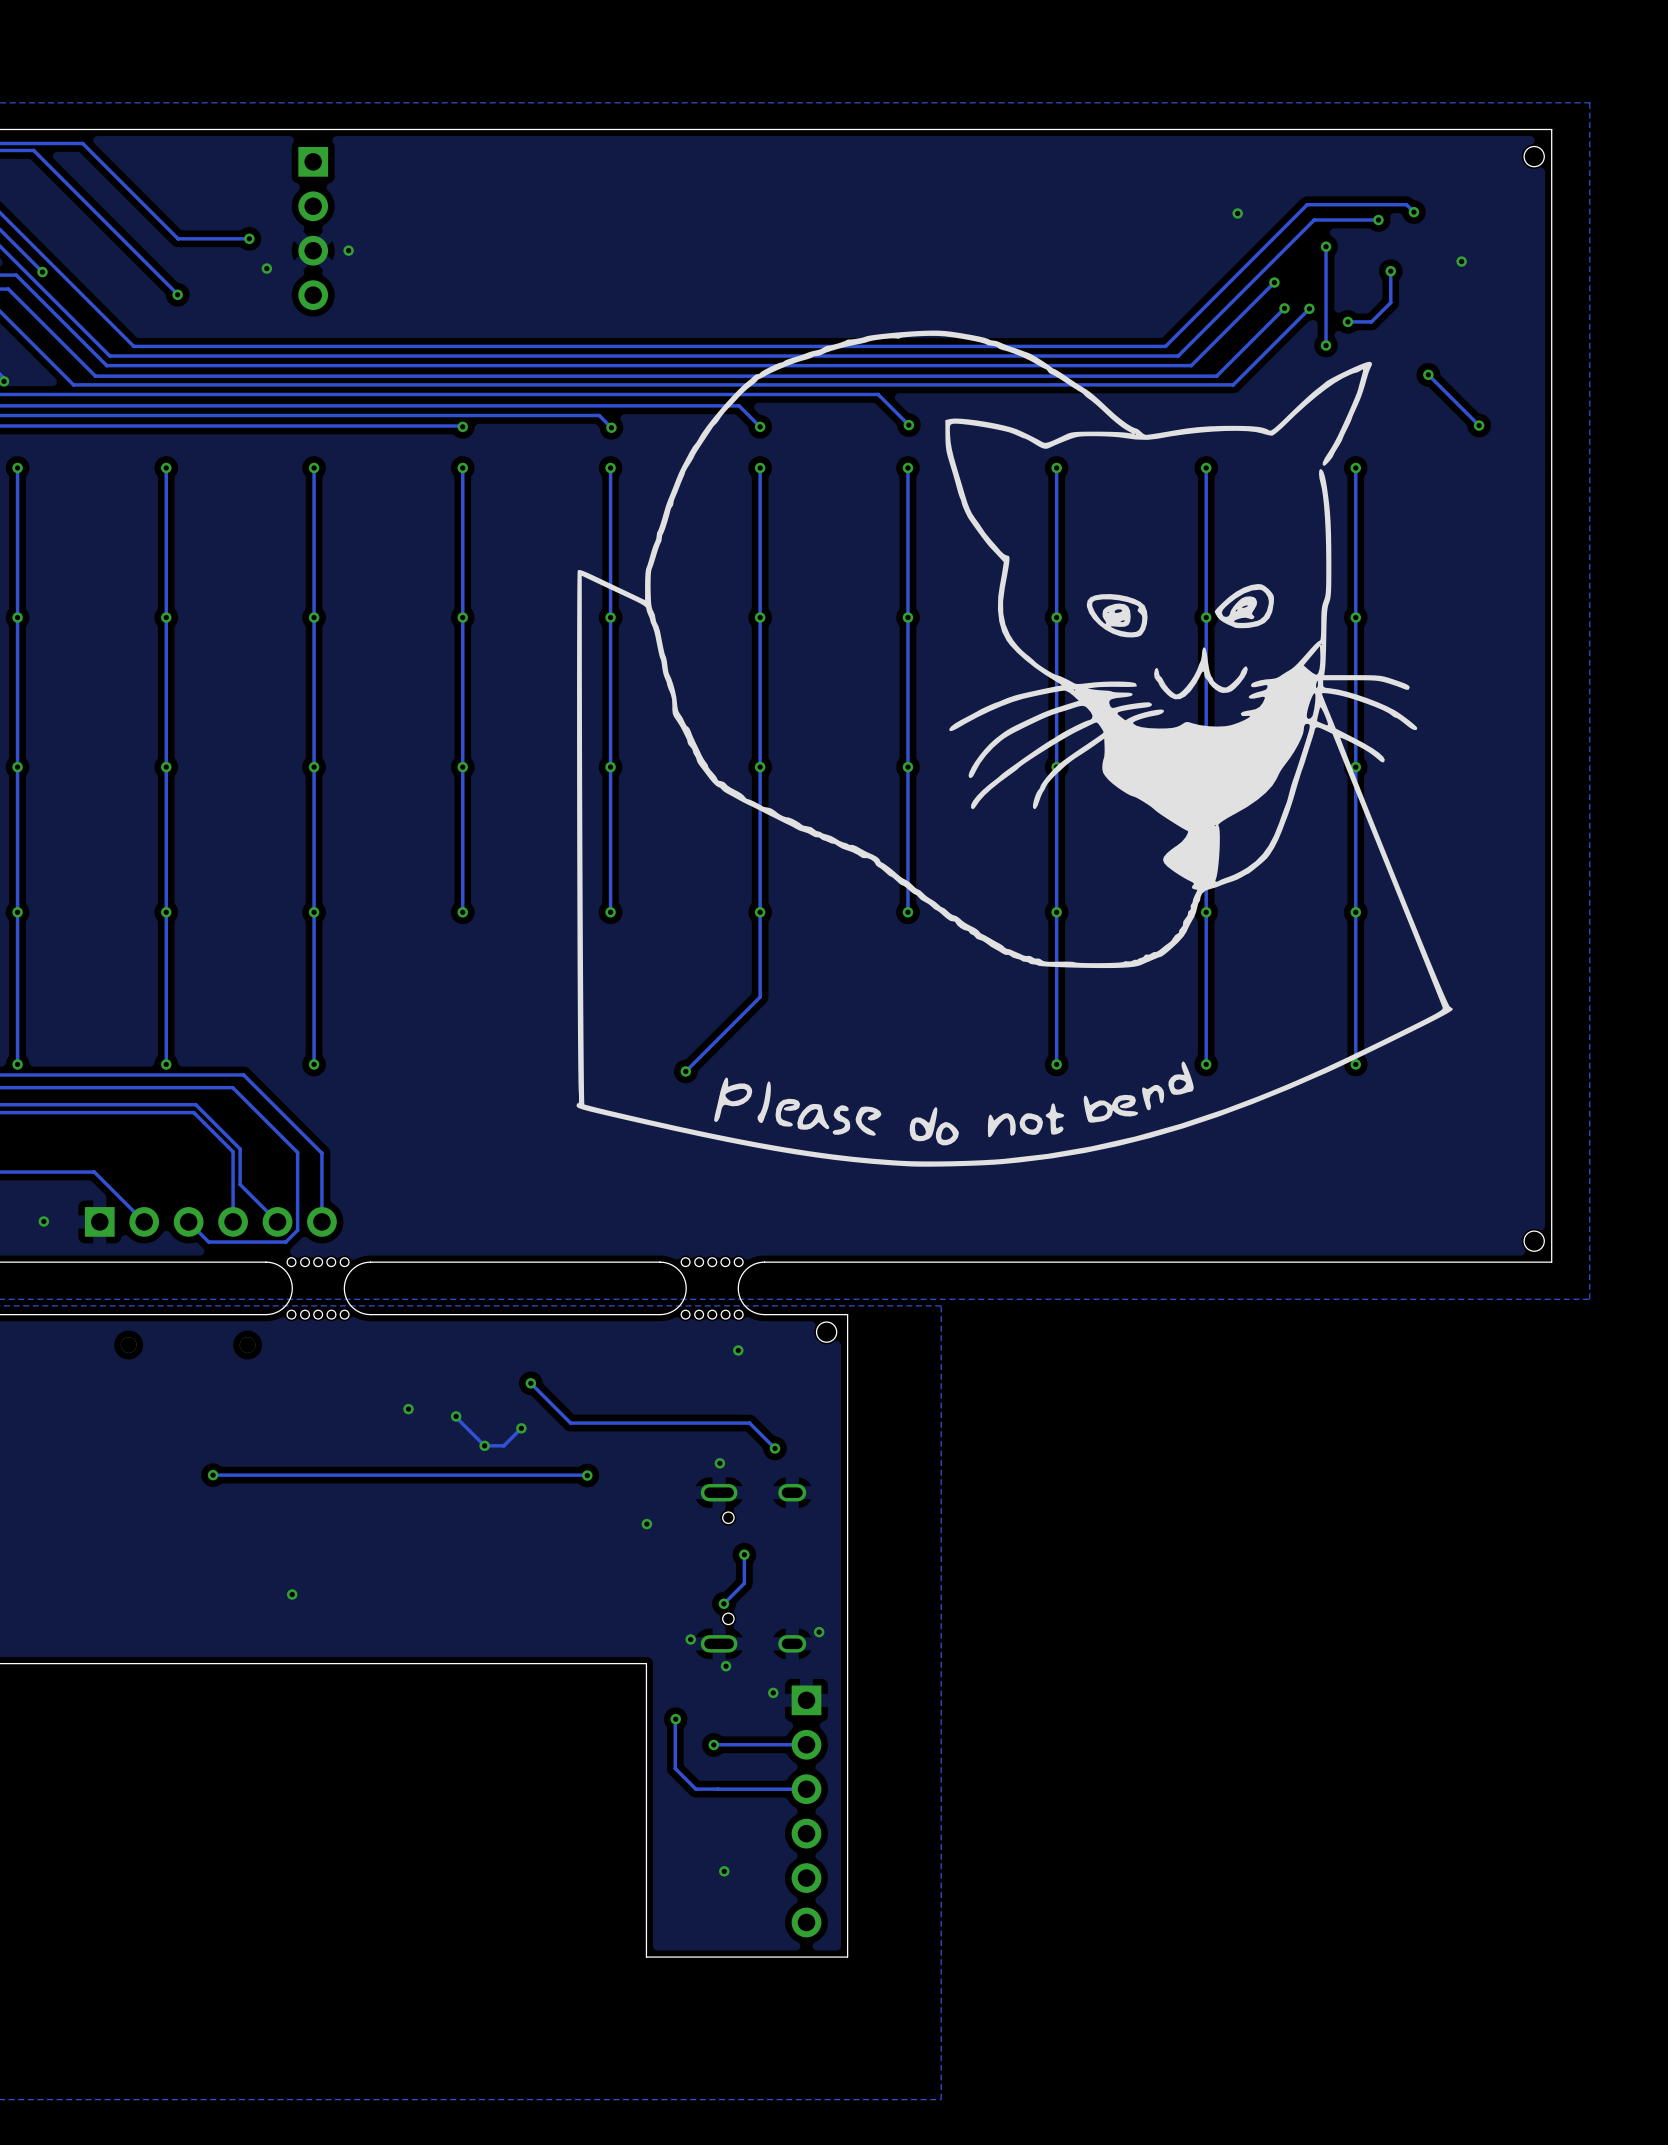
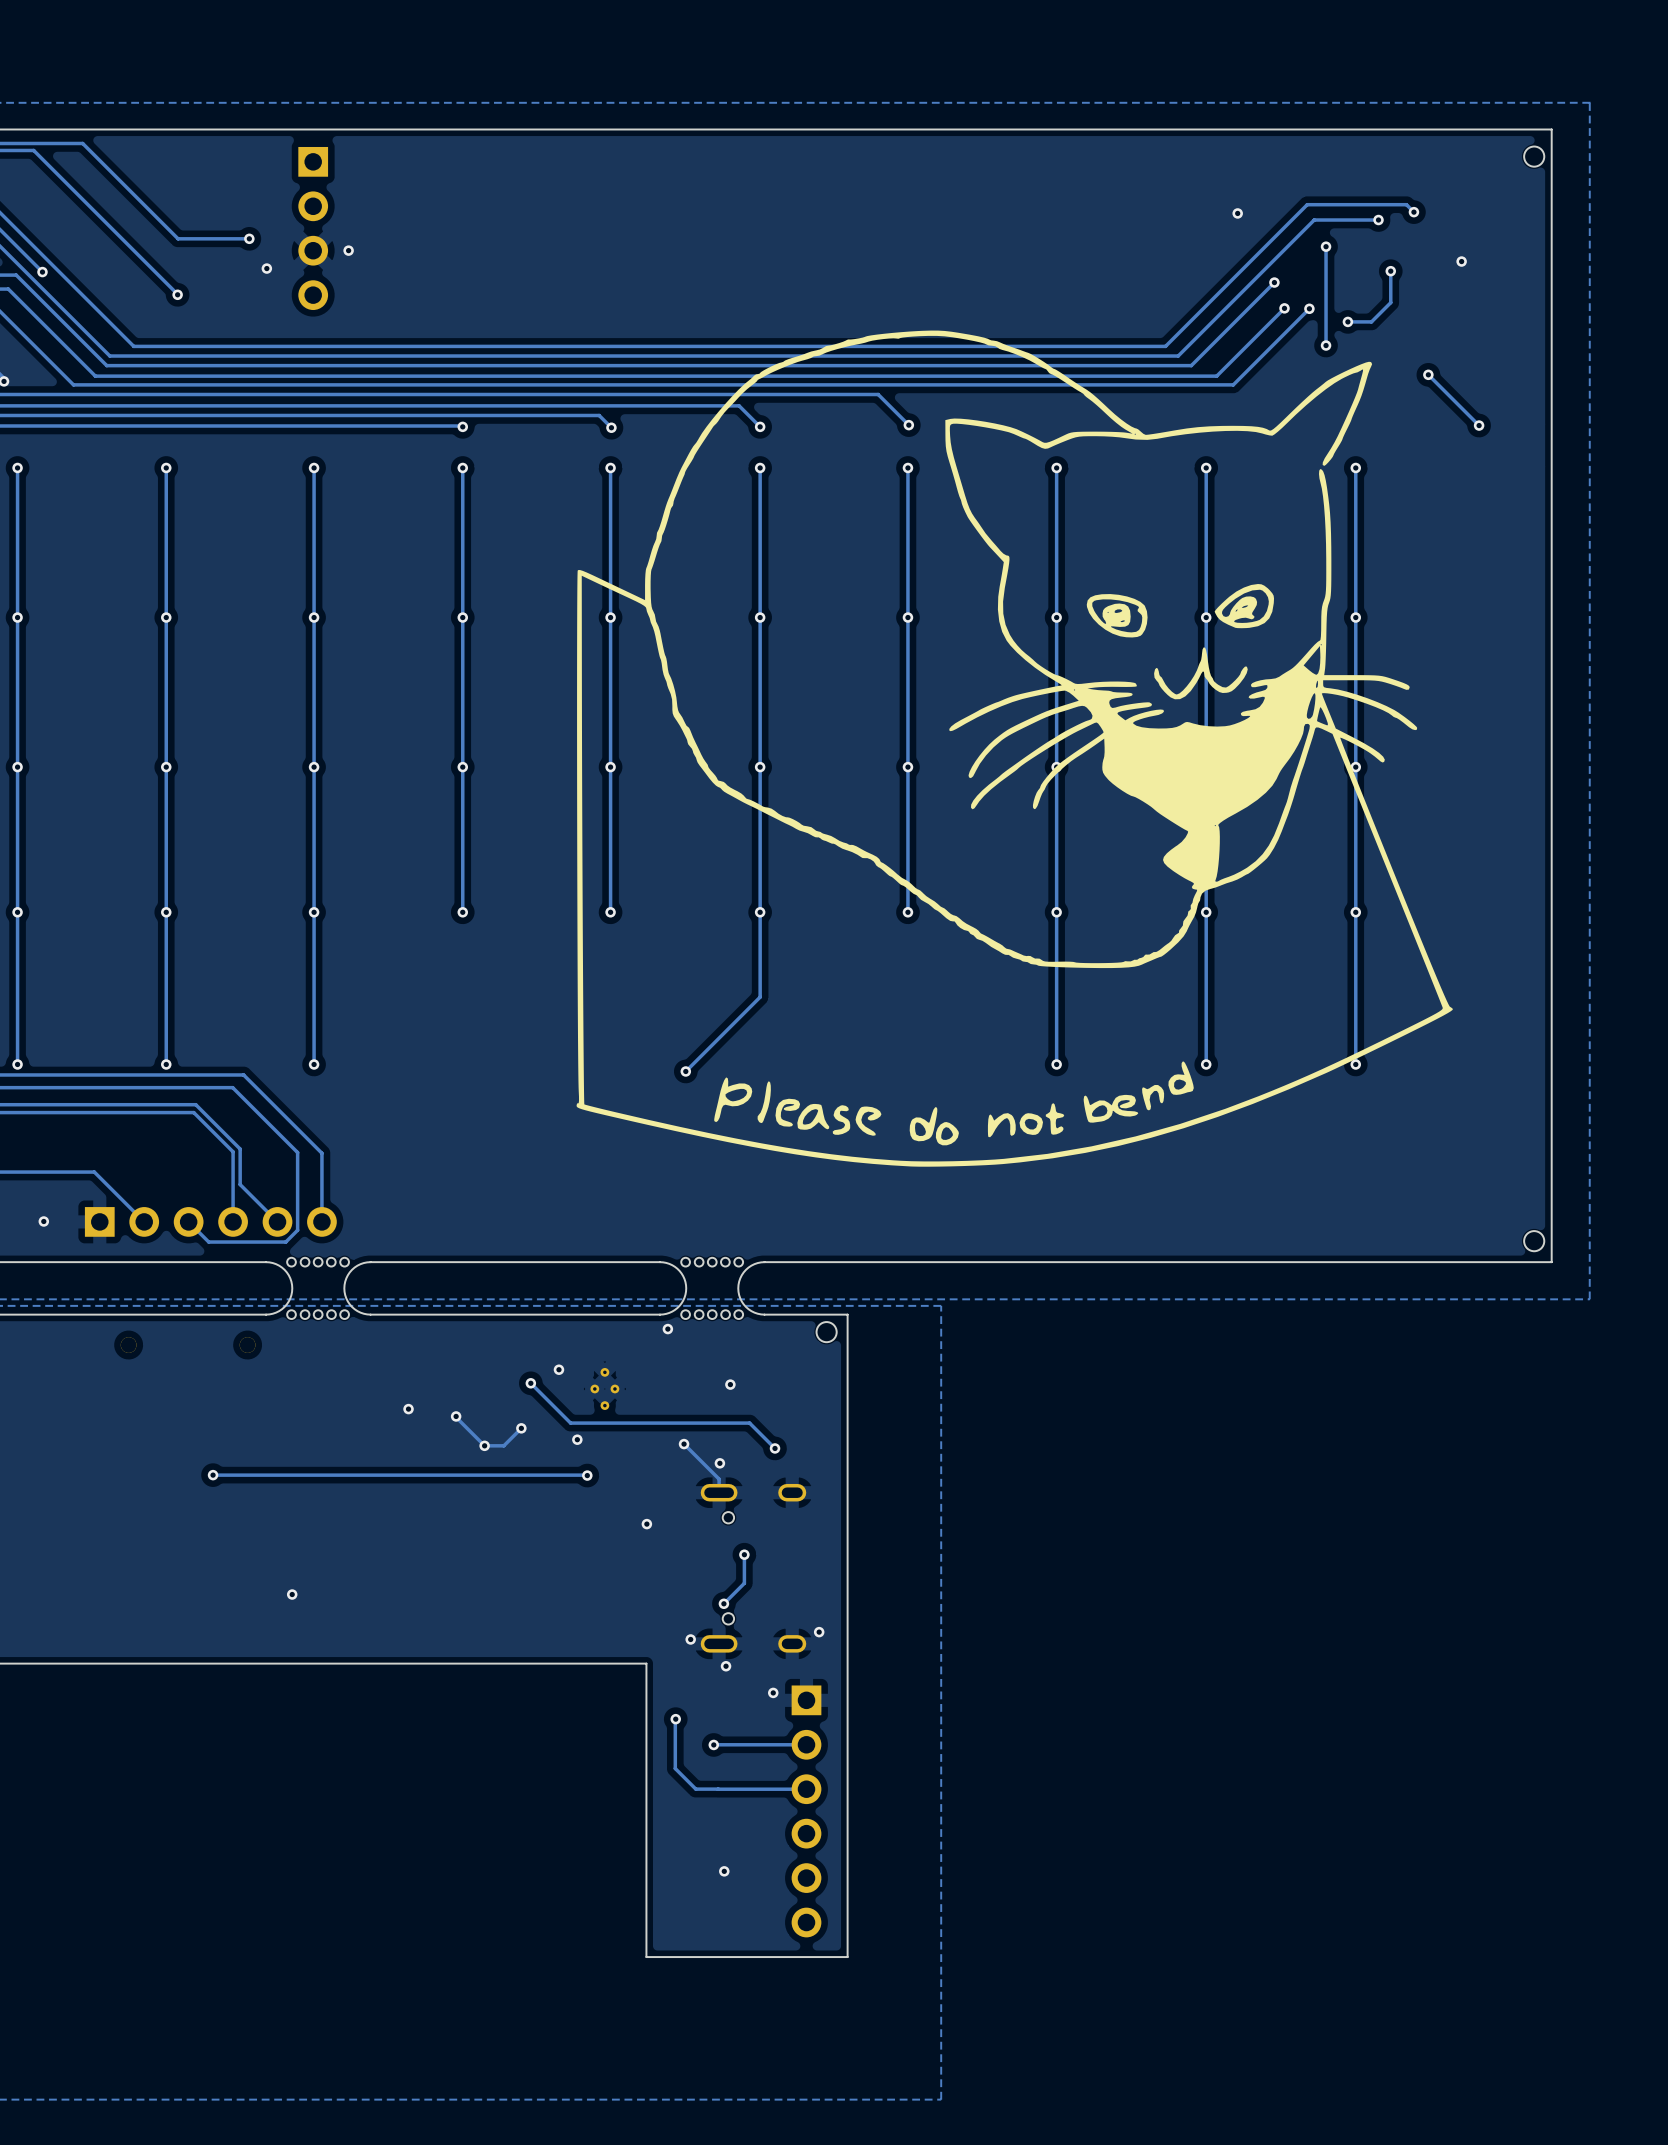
via: none -> (667, 1329)
via position: (738, 1350) -> (730, 1384)
via: none -> (558, 1369)
part: none -> (604, 1388)
via: none -> (577, 1439)
track: none -> (684, 1444) (719, 1479) (719, 1492)
via: none -> (684, 1444)

